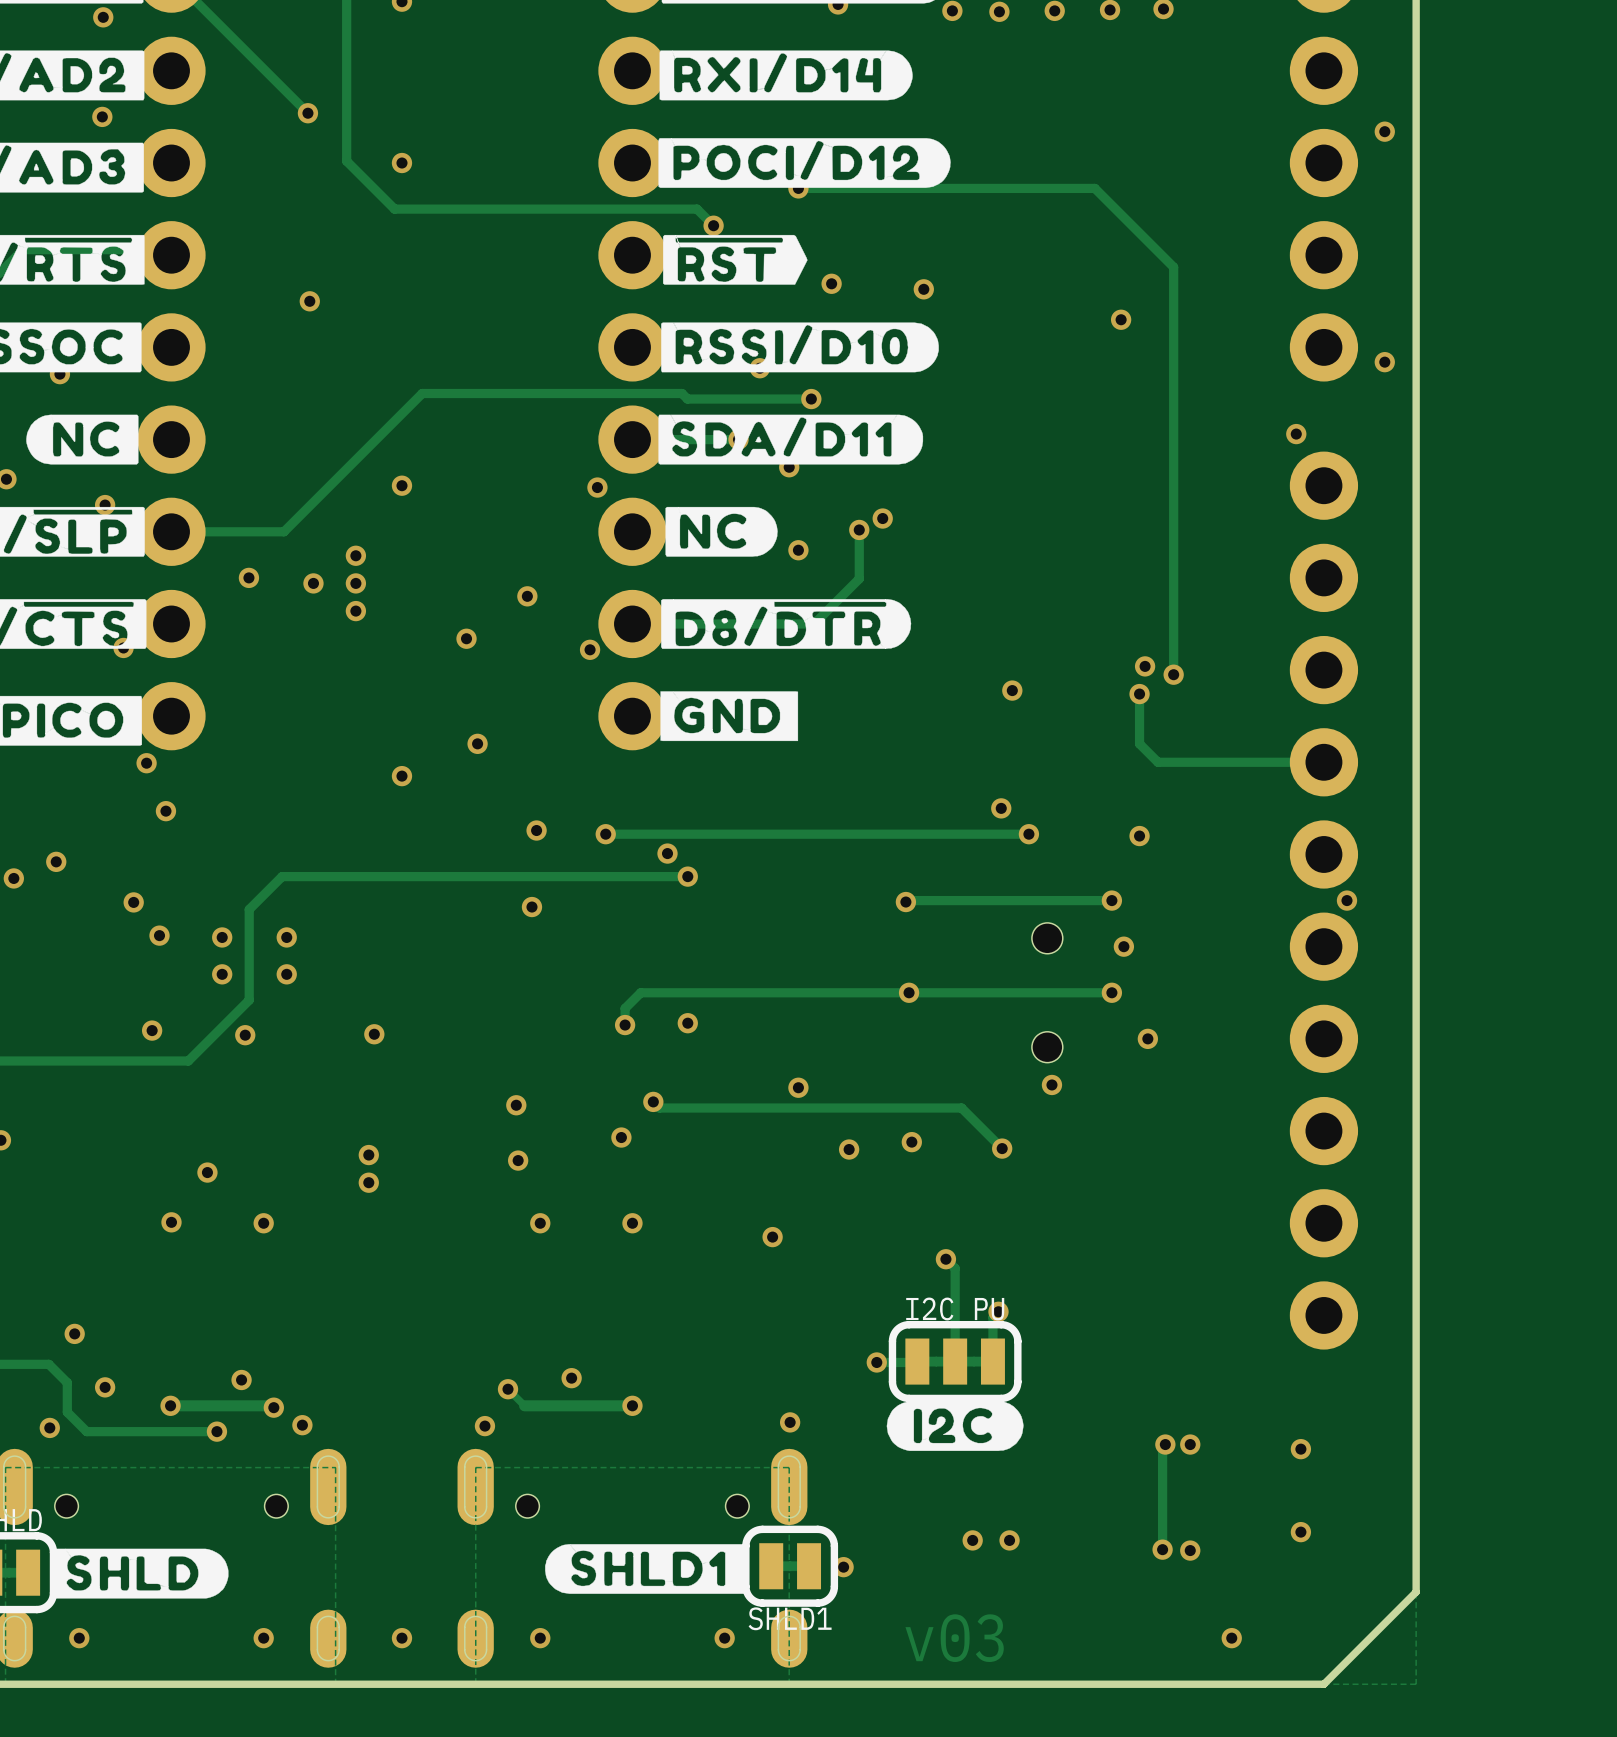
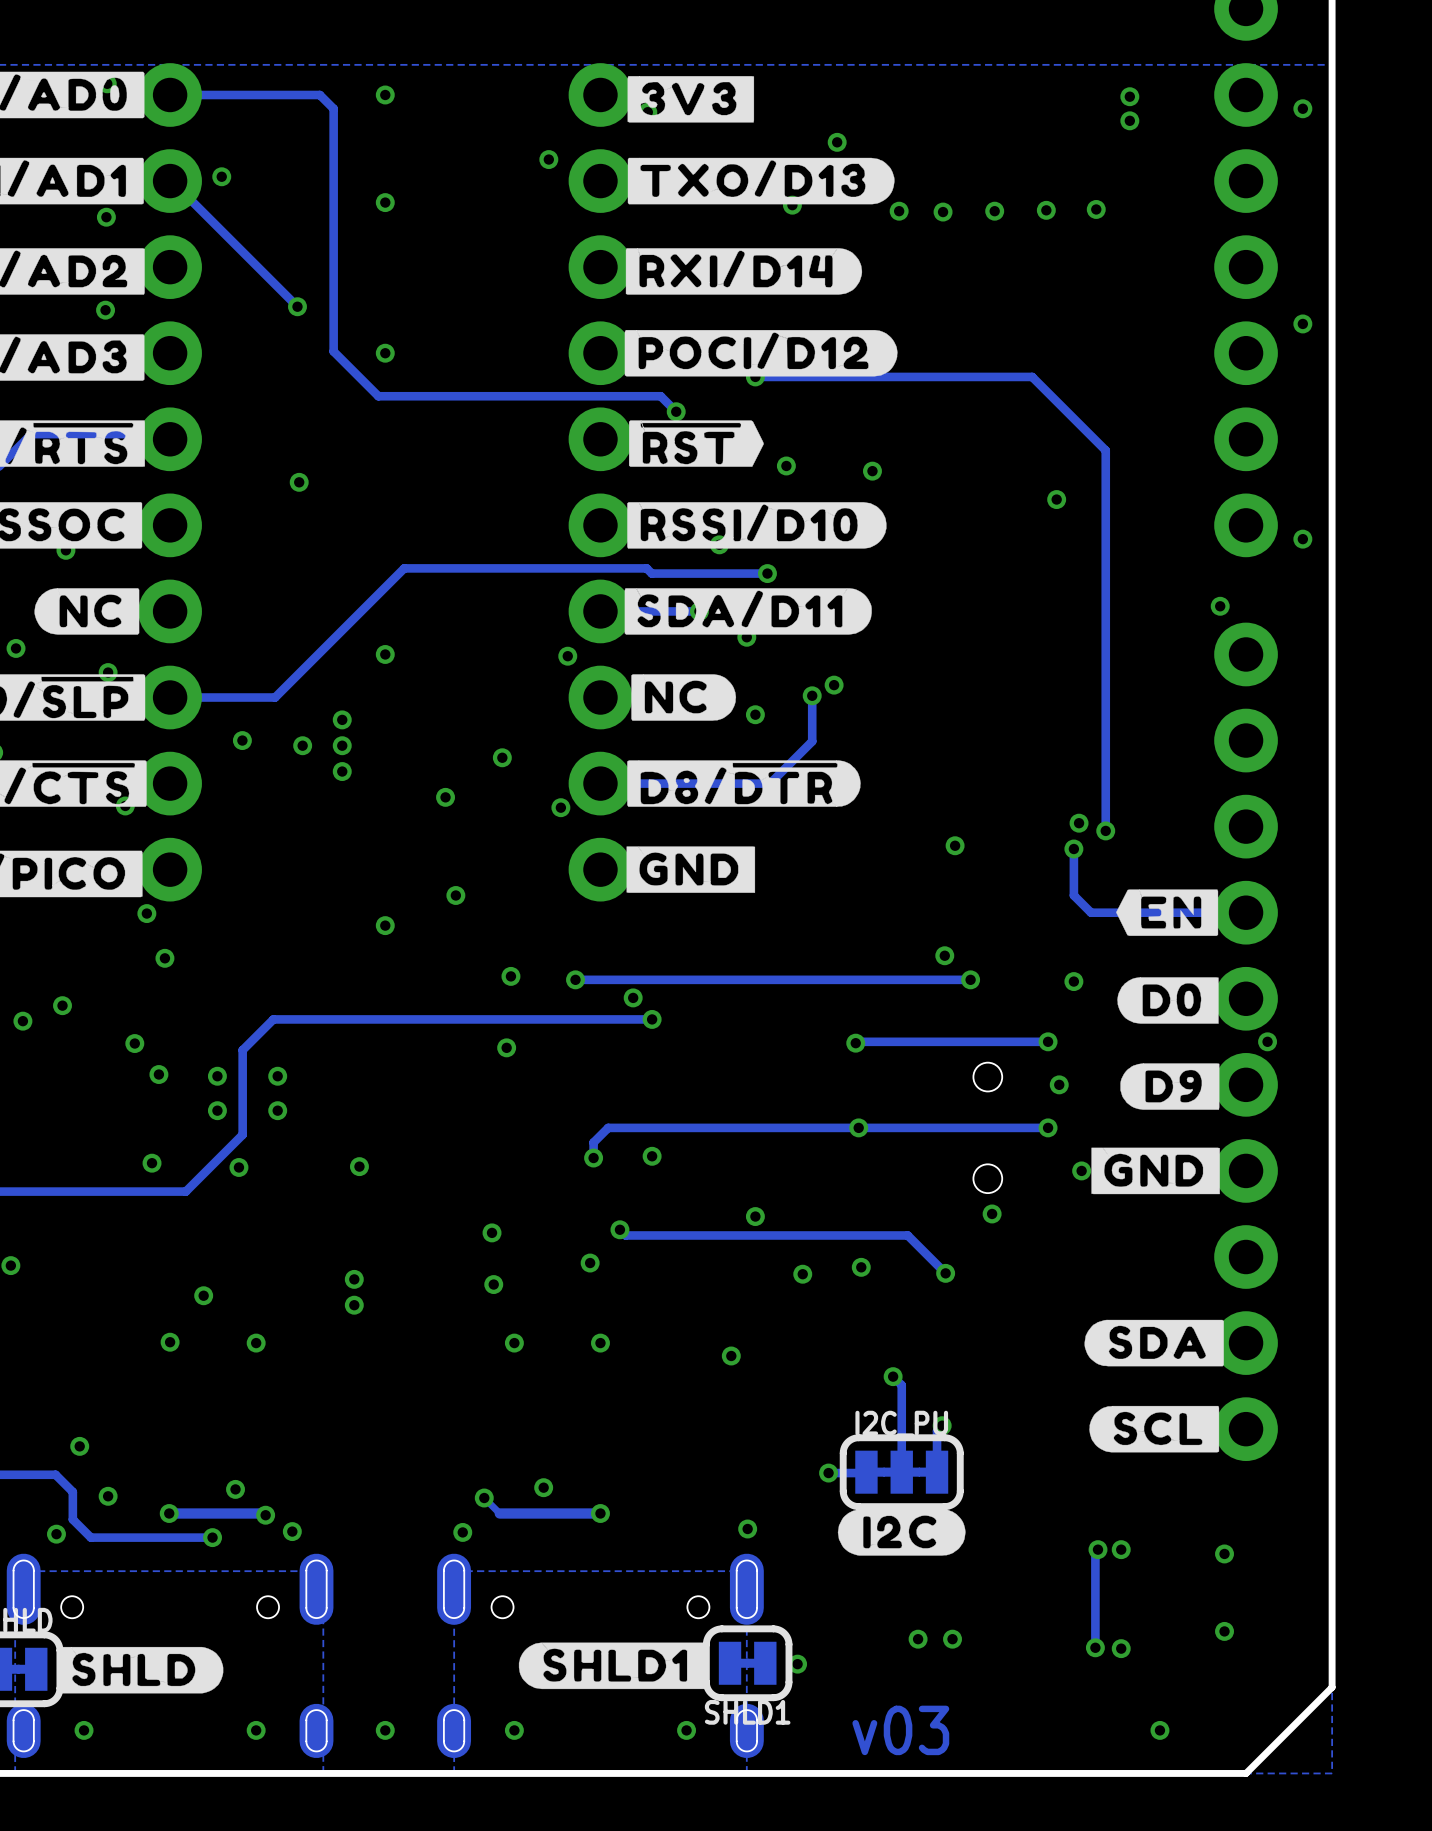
drawing: none -> [1116, 889, 1219, 936]
drawing: none -> [1091, 977, 1220, 1195]
drawing: none -> [1084, 1319, 1224, 1453]

